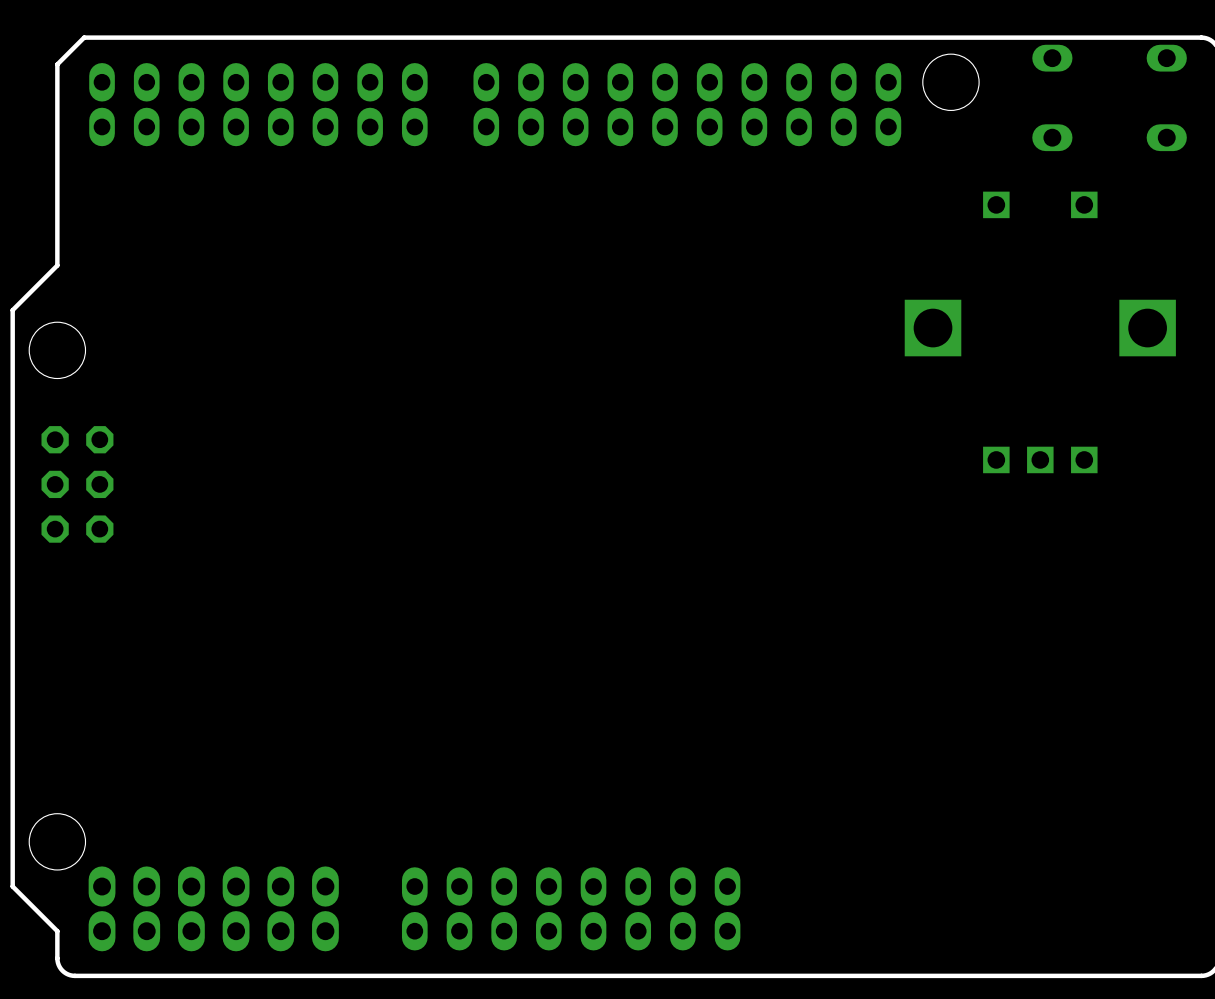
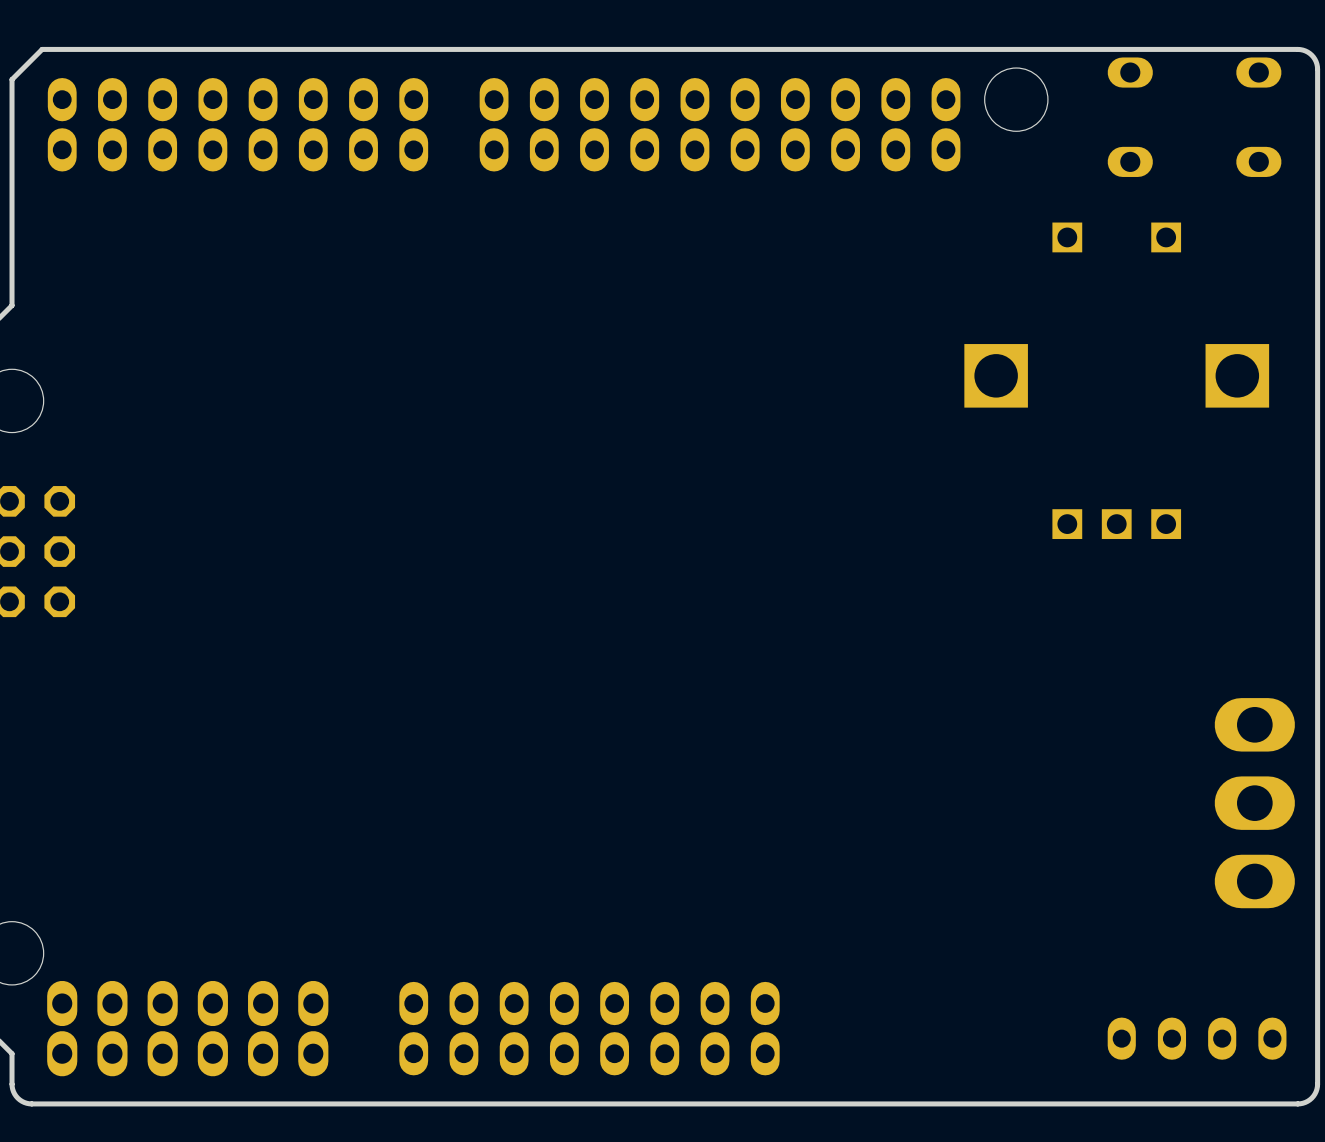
part: none -> (1254, 803)
part: none -> (1197, 1038)

